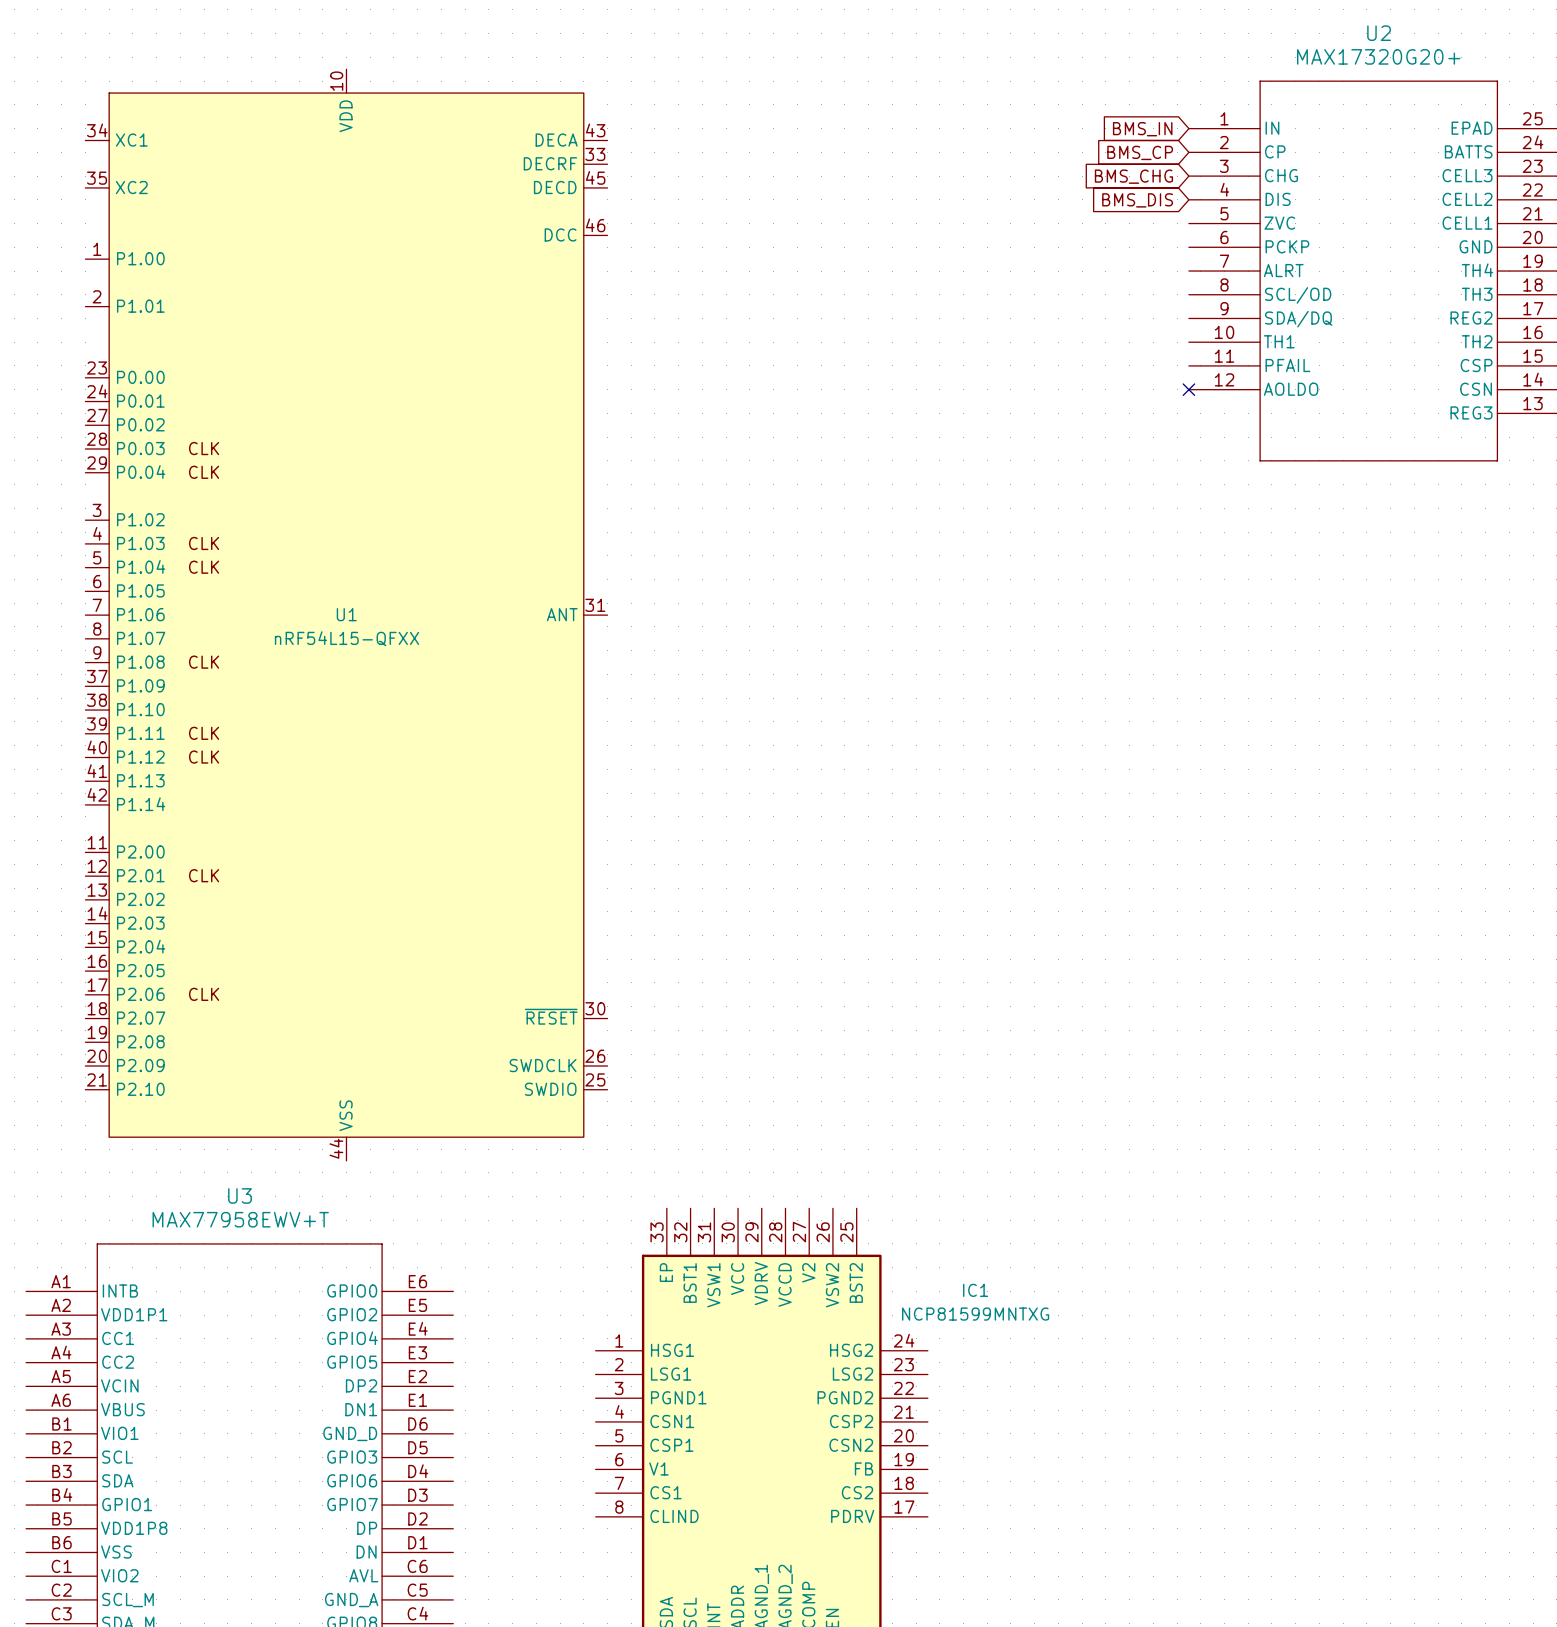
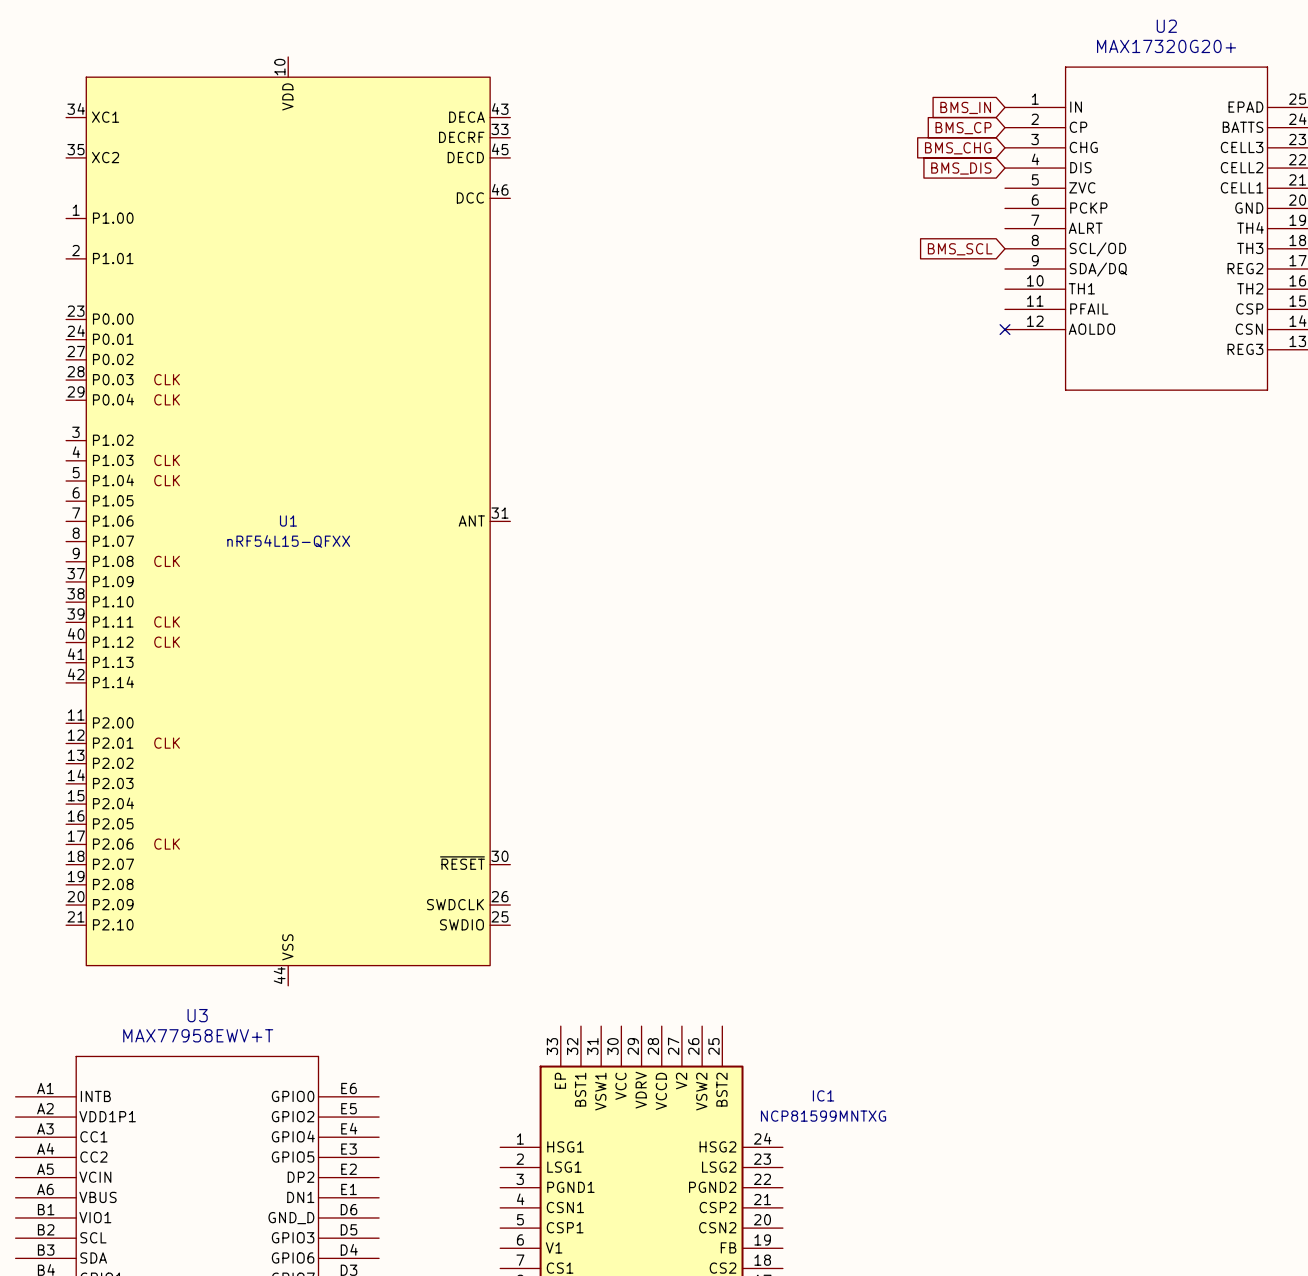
global label: none -> BMS_SCL (960, 249)

